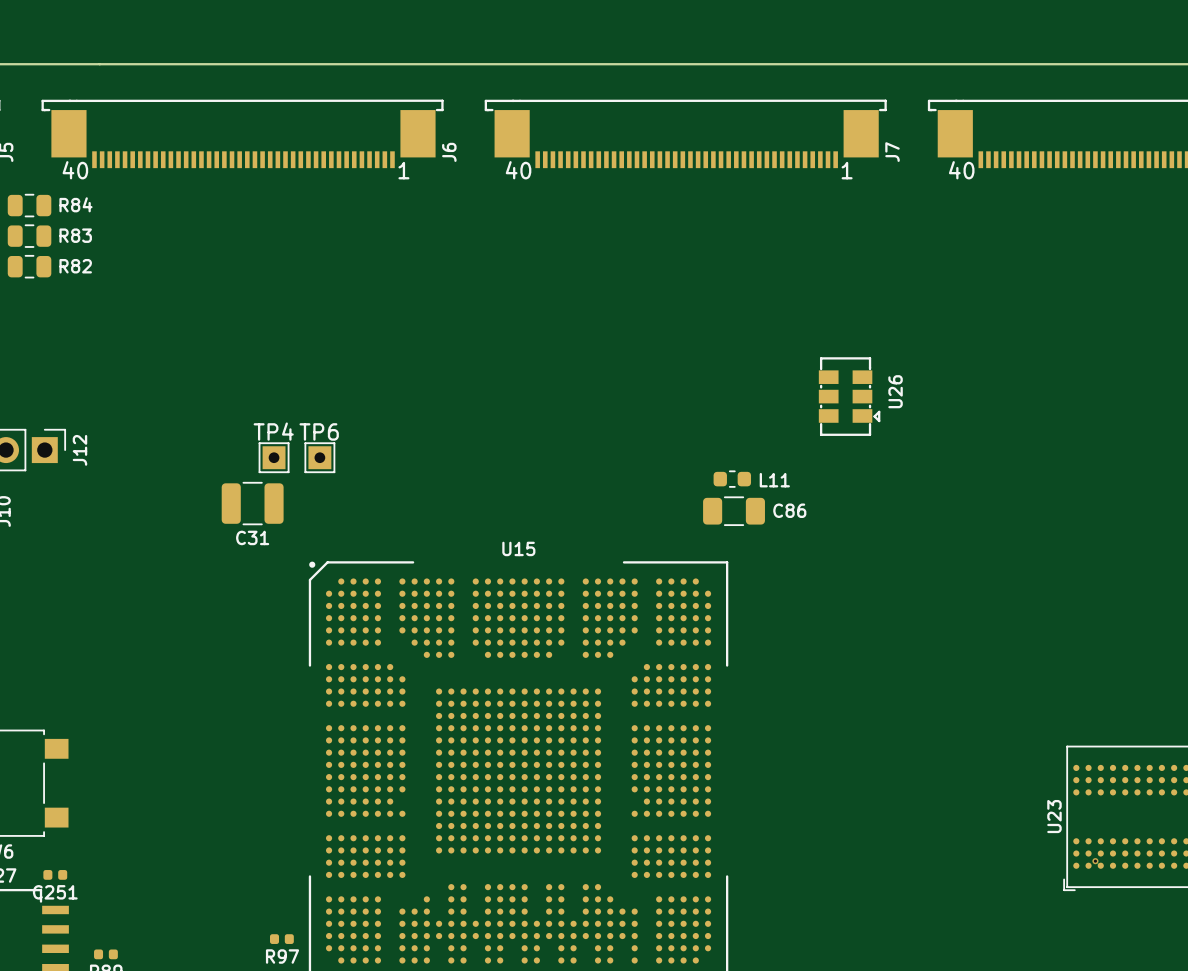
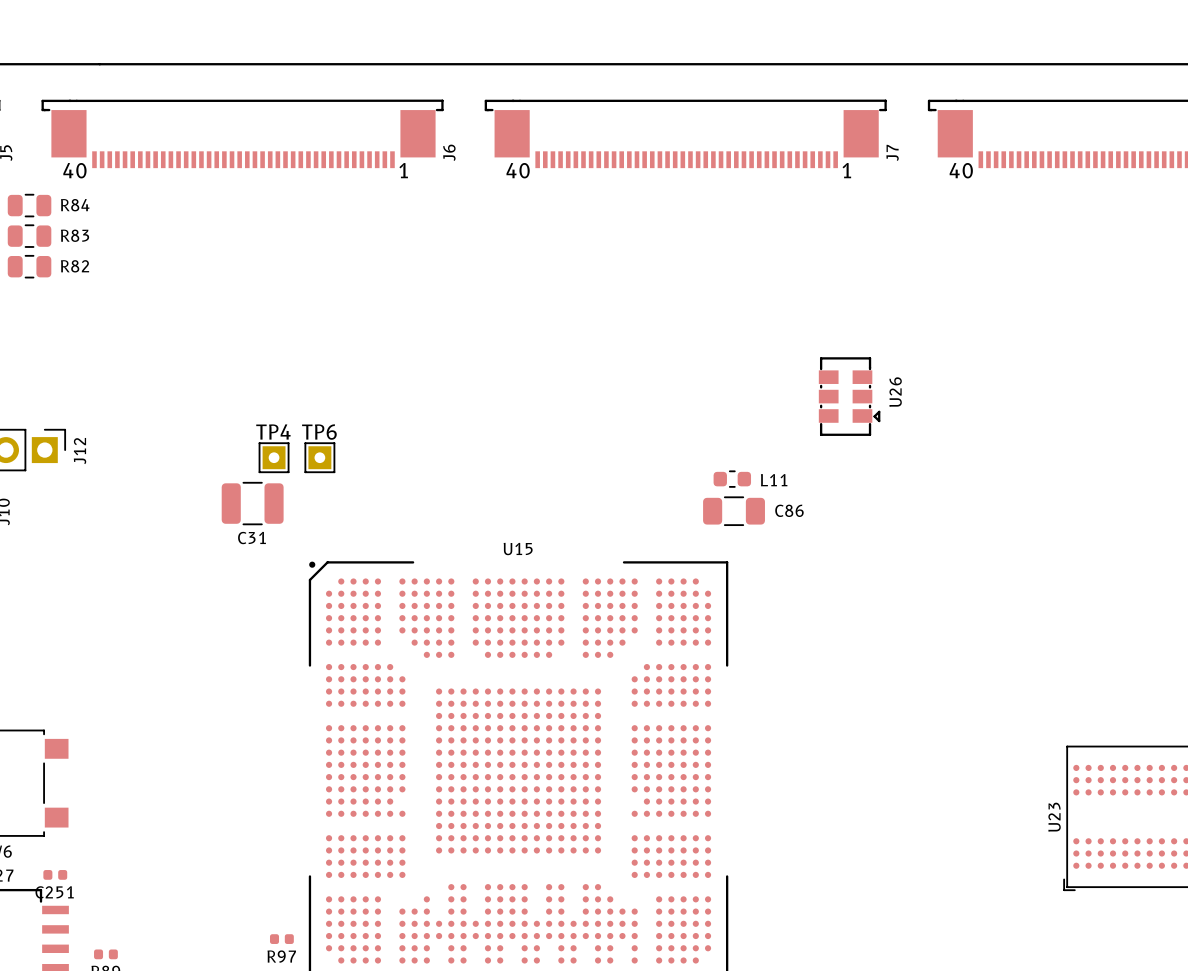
via: (1095, 861) -> none

